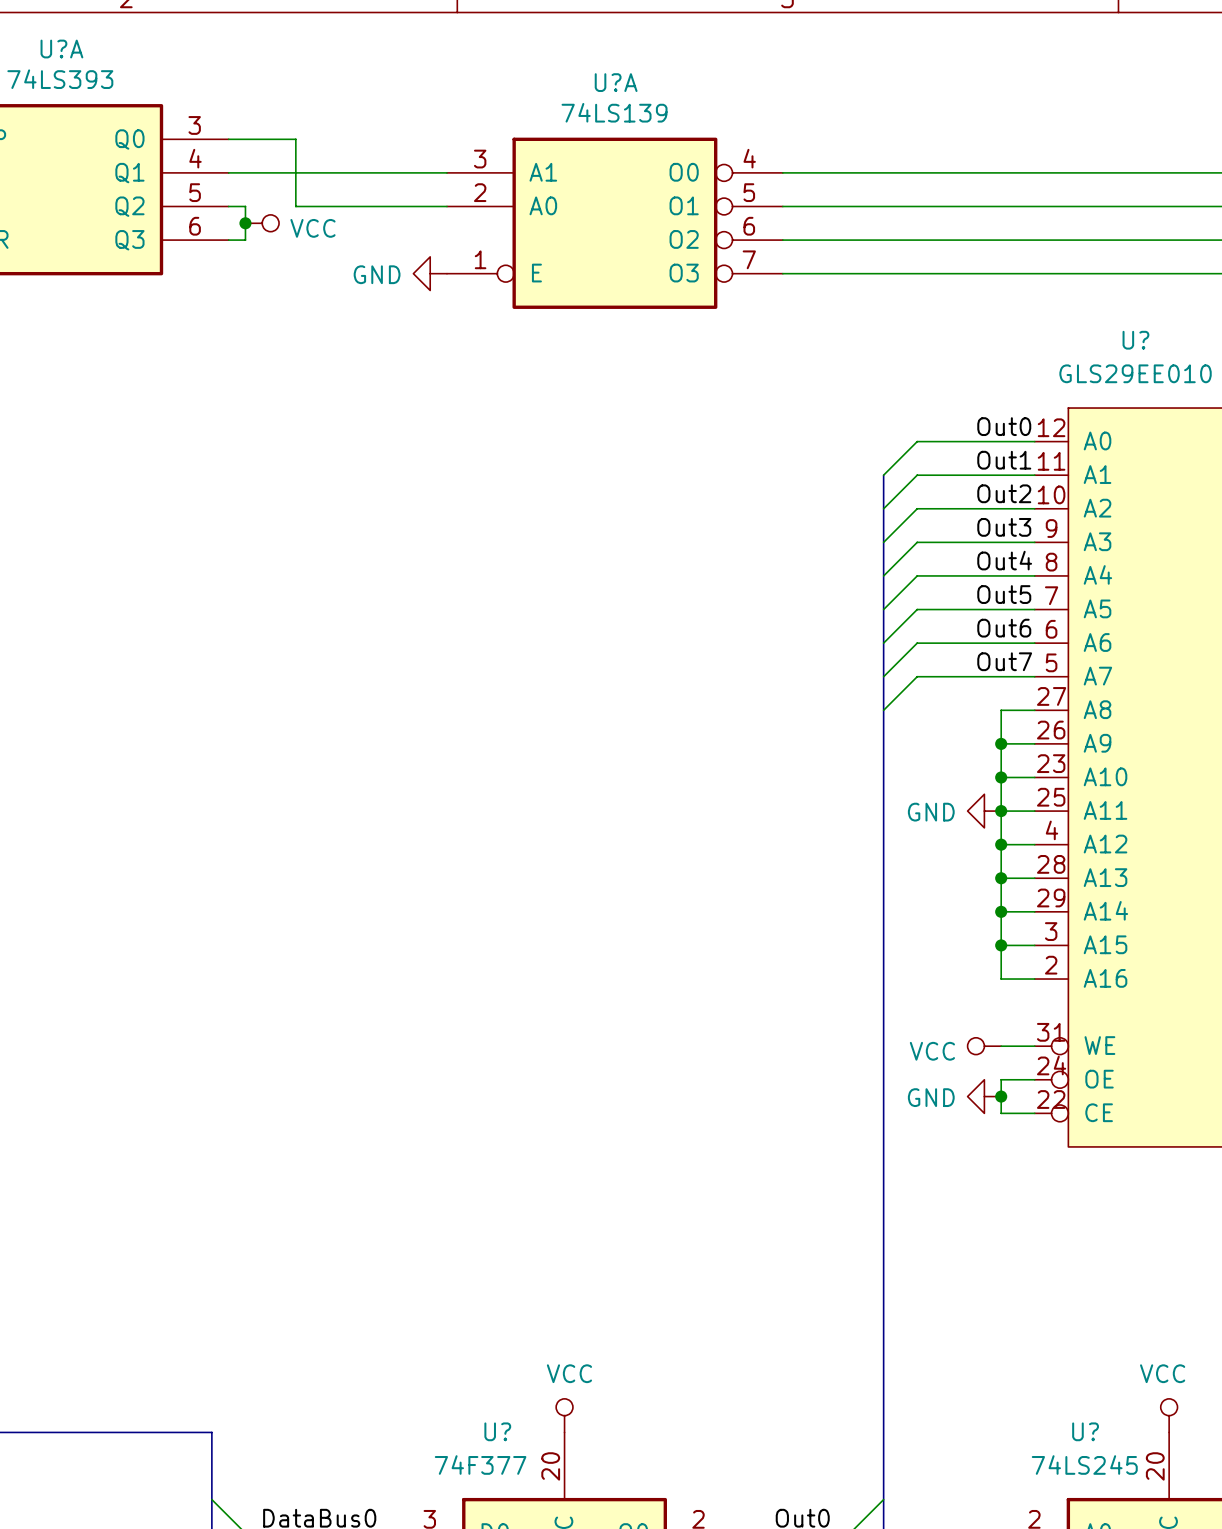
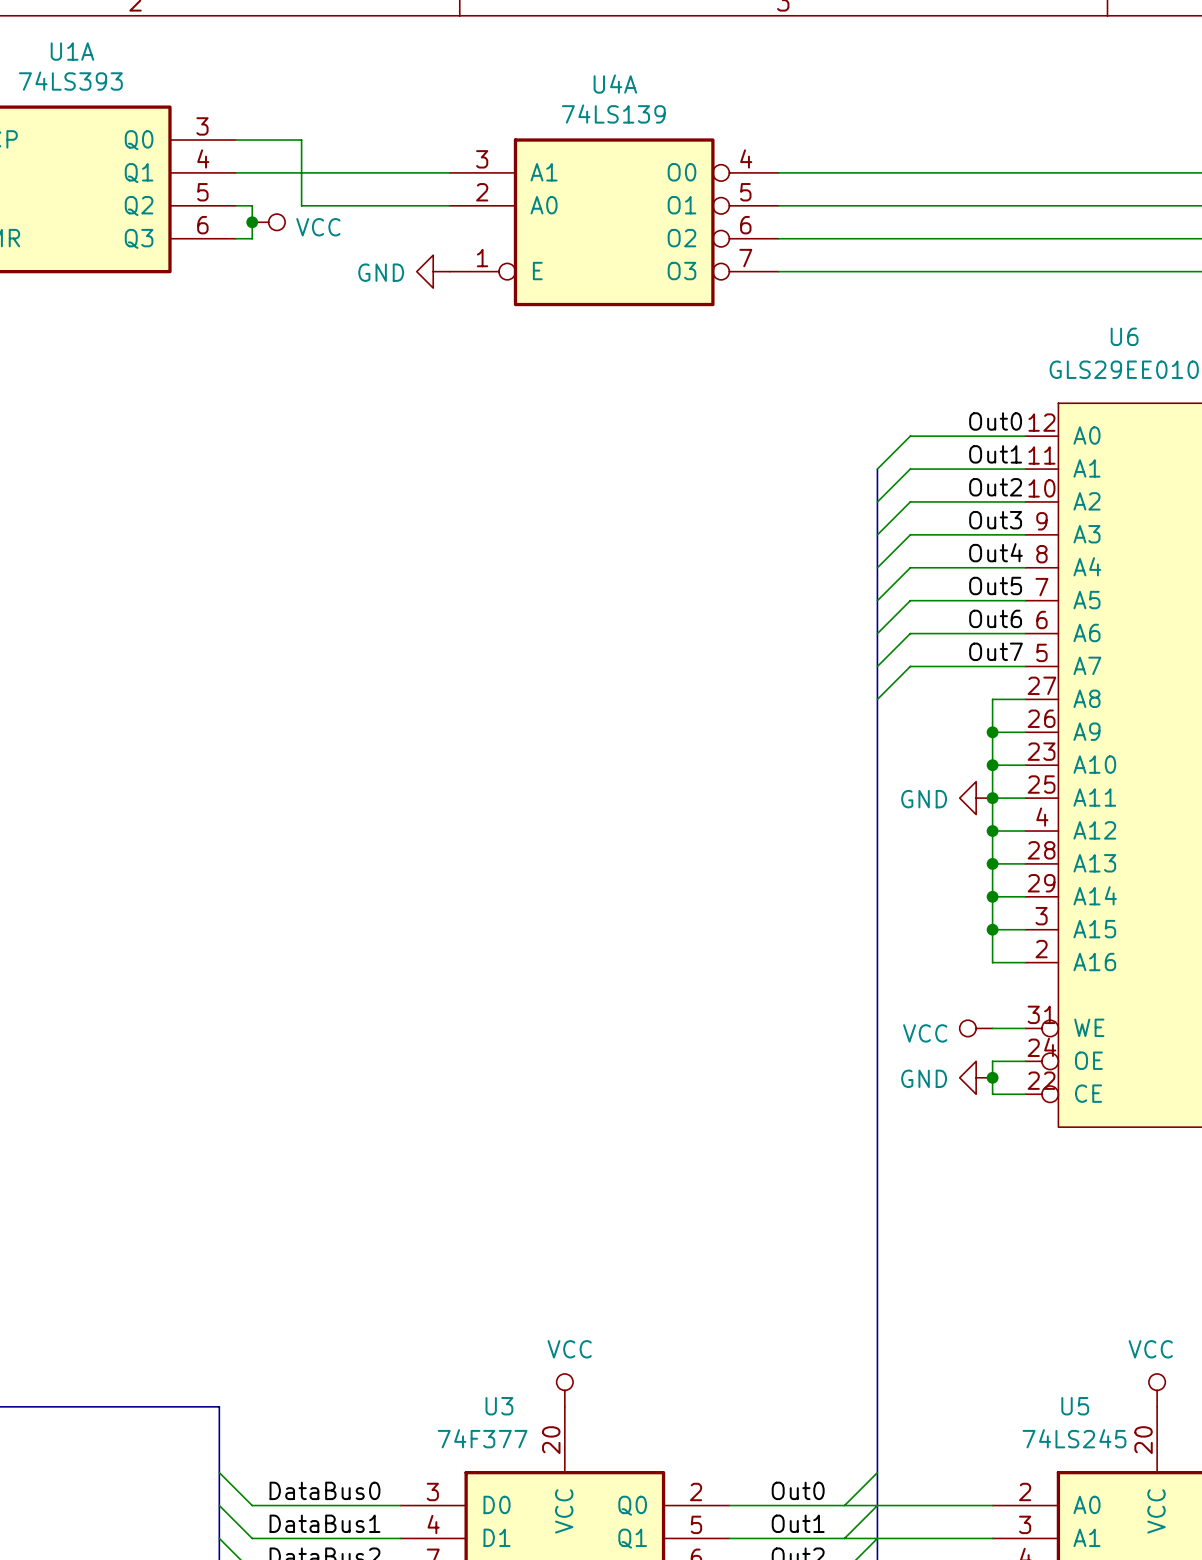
U?A name: U?A (61, 49) -> U1A (72, 51)
U?A name: U?A (616, 82) -> U4A (615, 84)
U? name: U? (1135, 340) -> U6 (1124, 336)
U? name: U? (497, 1431) -> U3 (499, 1406)
U? name: U? (1085, 1431) -> U5 (1075, 1406)

